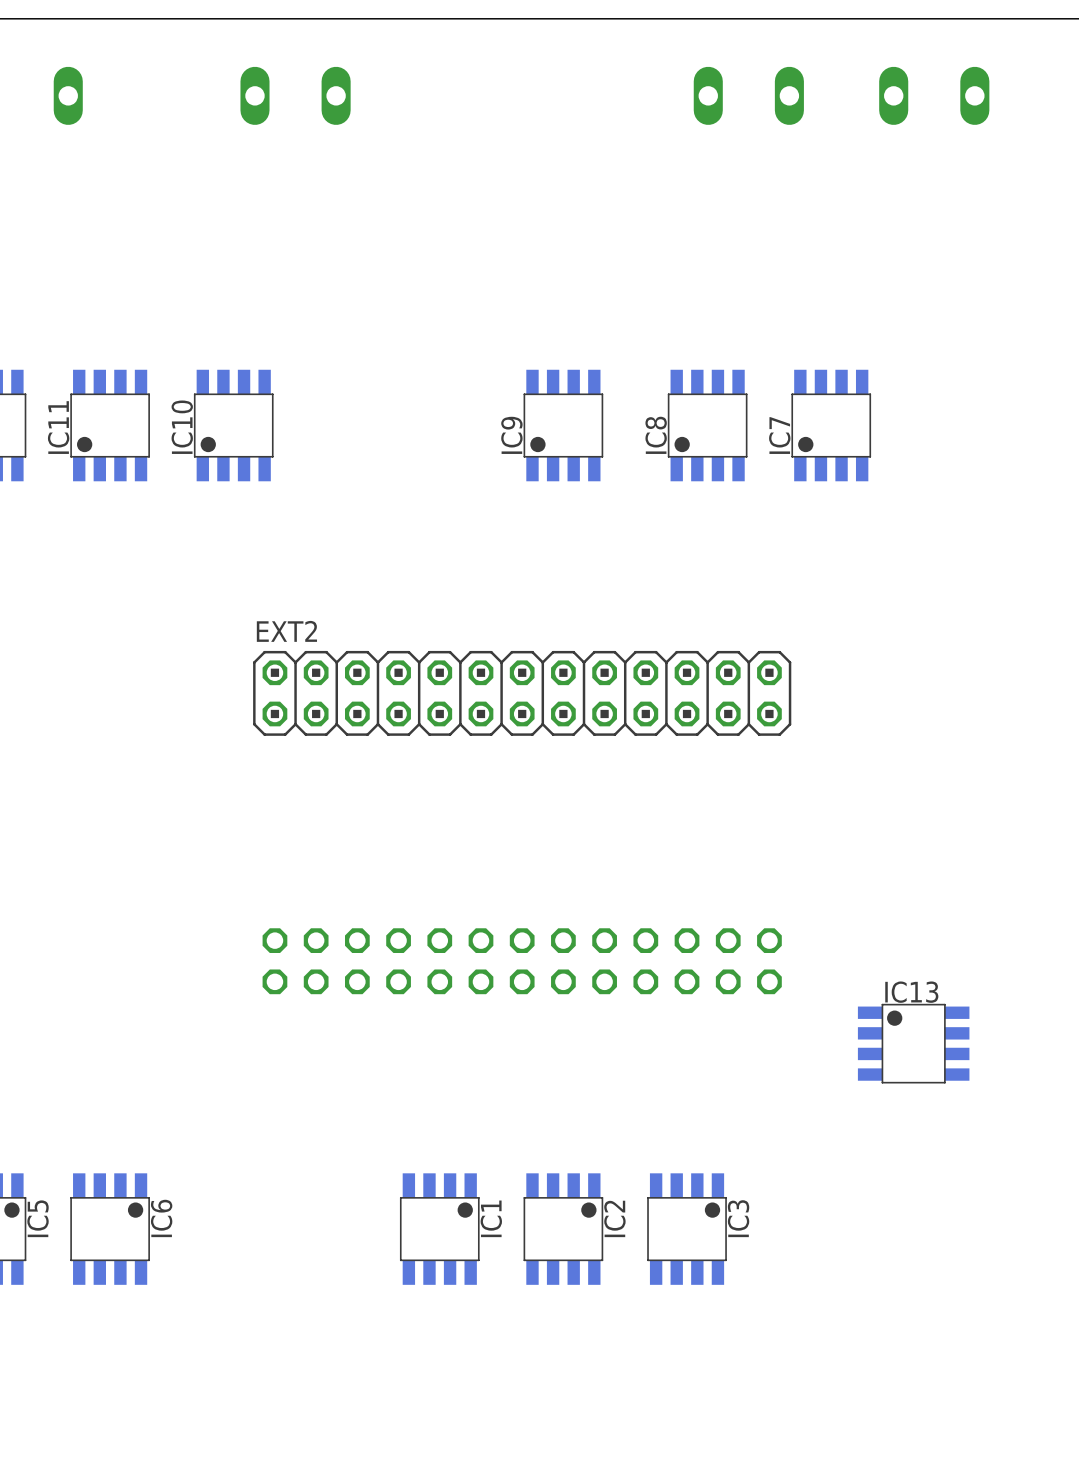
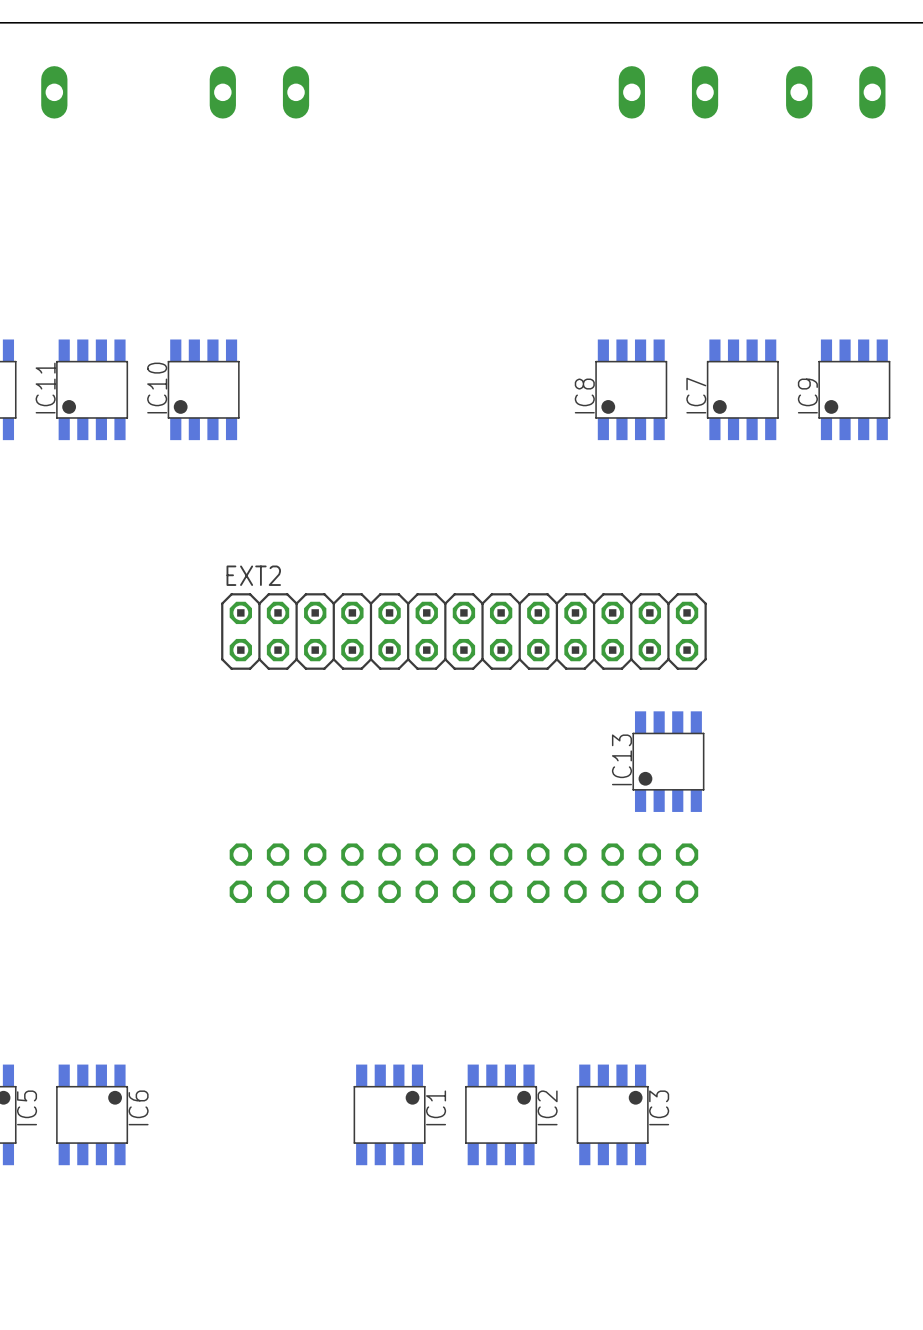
IC9 position: (563, 425) -> (854, 389)
IC13 rotation: 0° (913, 1043) -> 90° counterclockwise (668, 761)
IC13 position: (913, 1043) -> (668, 761)

